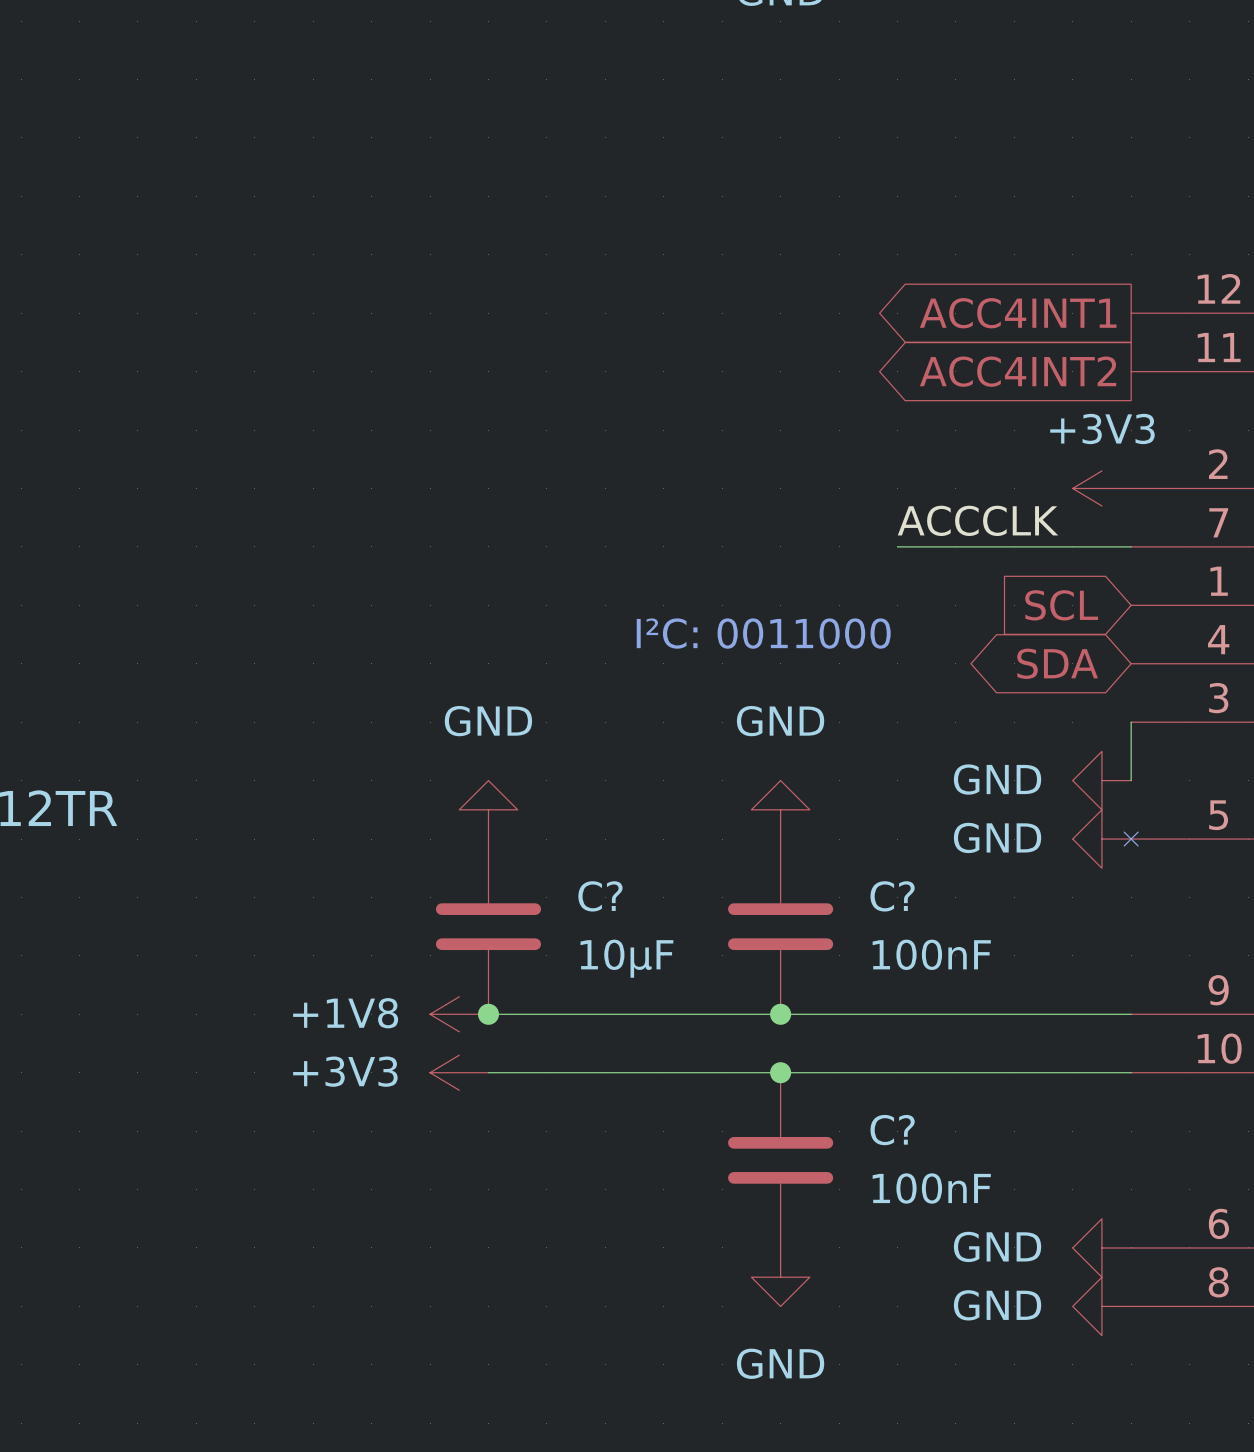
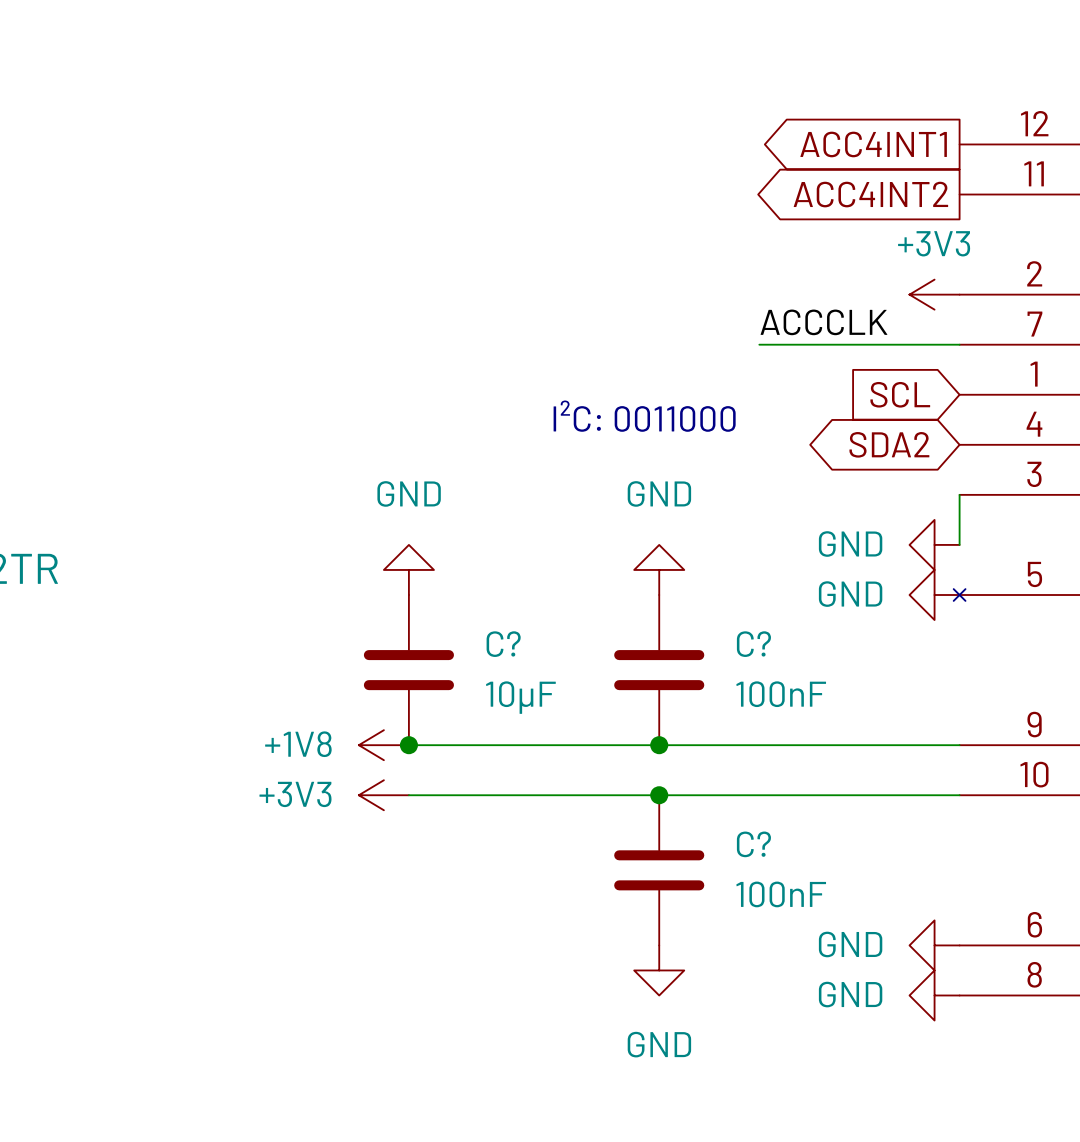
global label: SDA (1057, 663) -> SDA2 (889, 444)

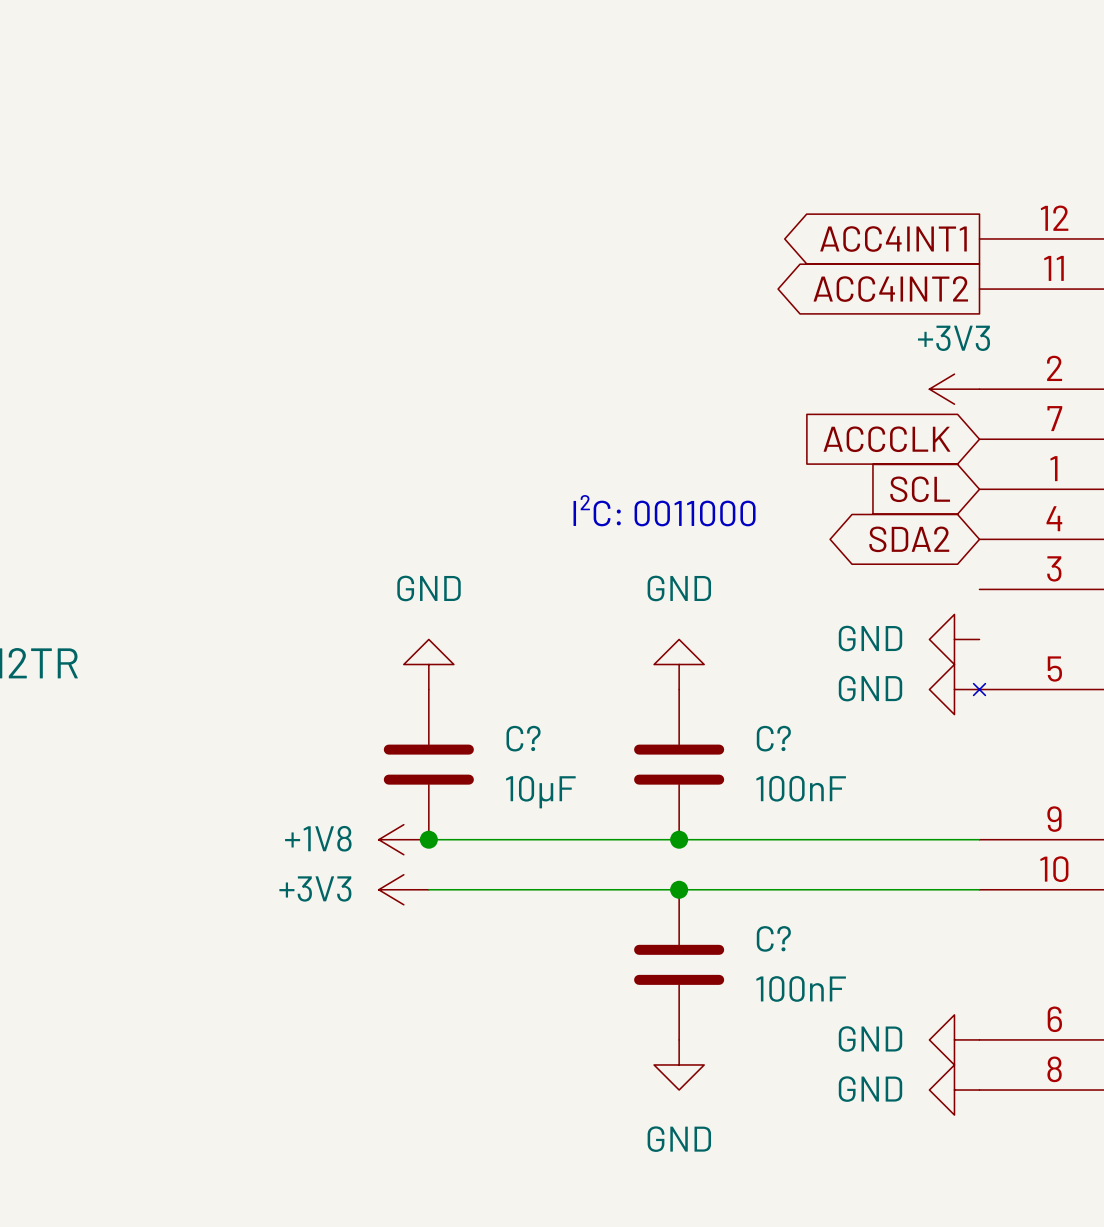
label: ACCCLK (823, 322) -> none
wire: (759, 344) (959, 344) -> none
global label: none -> ACCCLK (886, 439)
wire: (959, 494) (959, 544) -> none

